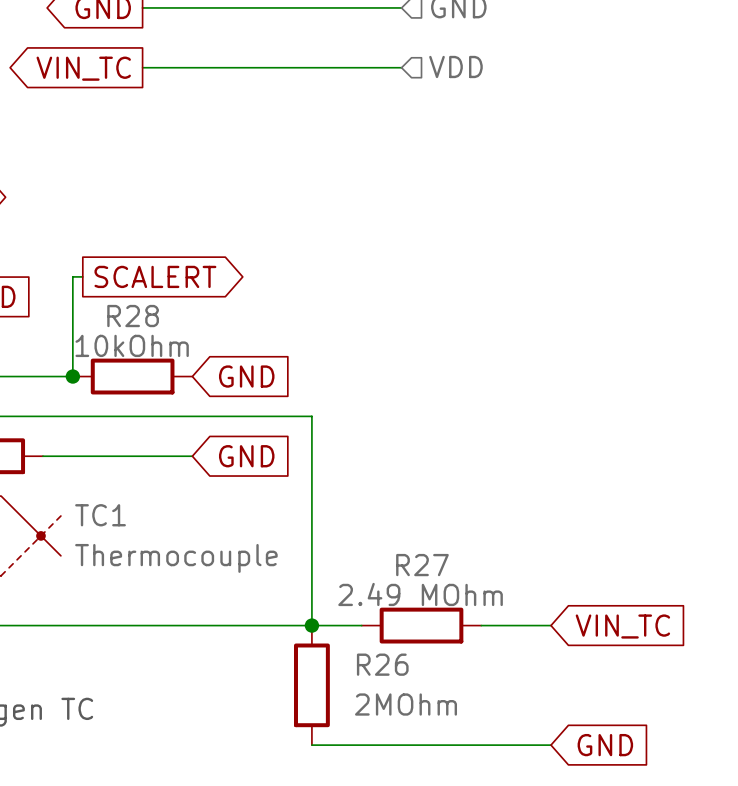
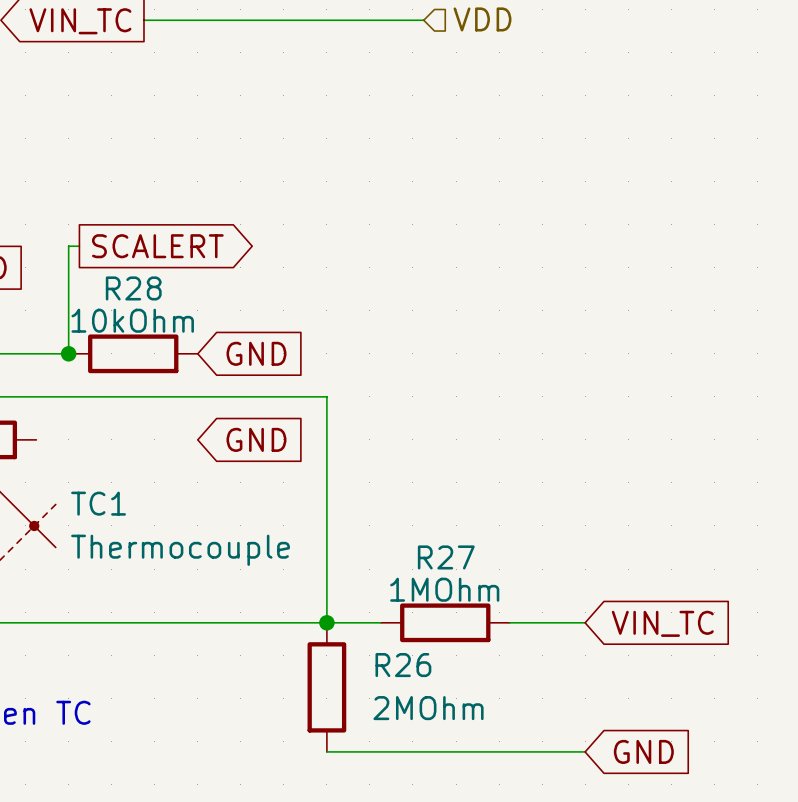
wire: (42, 456) (192, 456) -> none
R27 value: 2.49 MOhm (420, 594) -> 1MOhm (444, 589)

